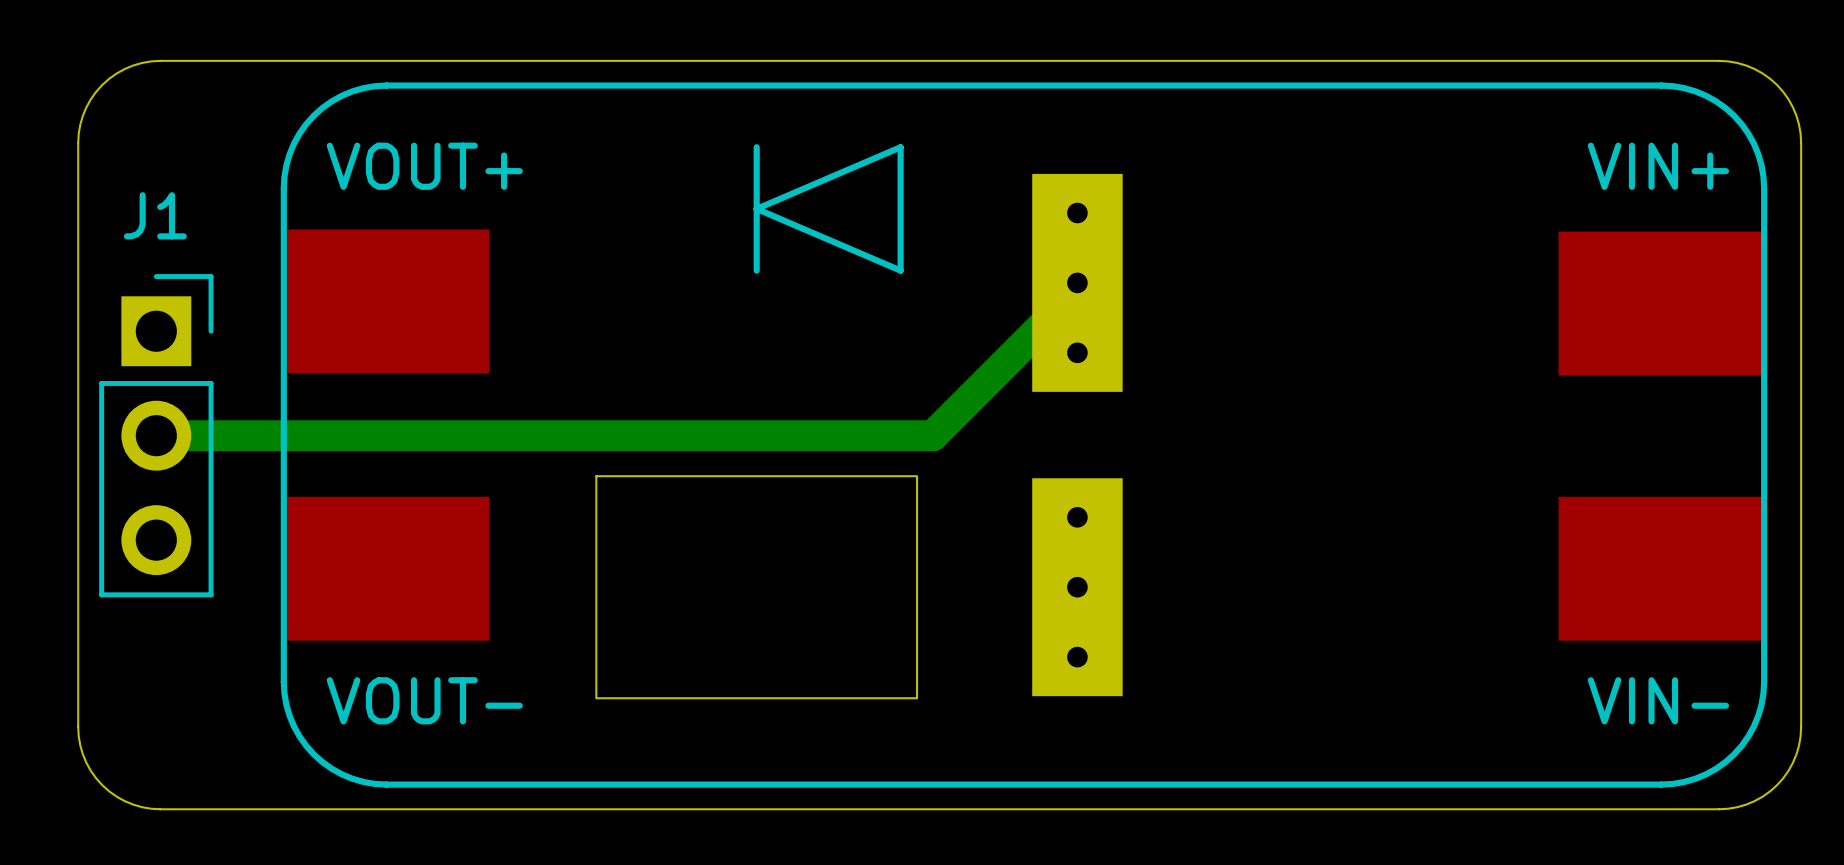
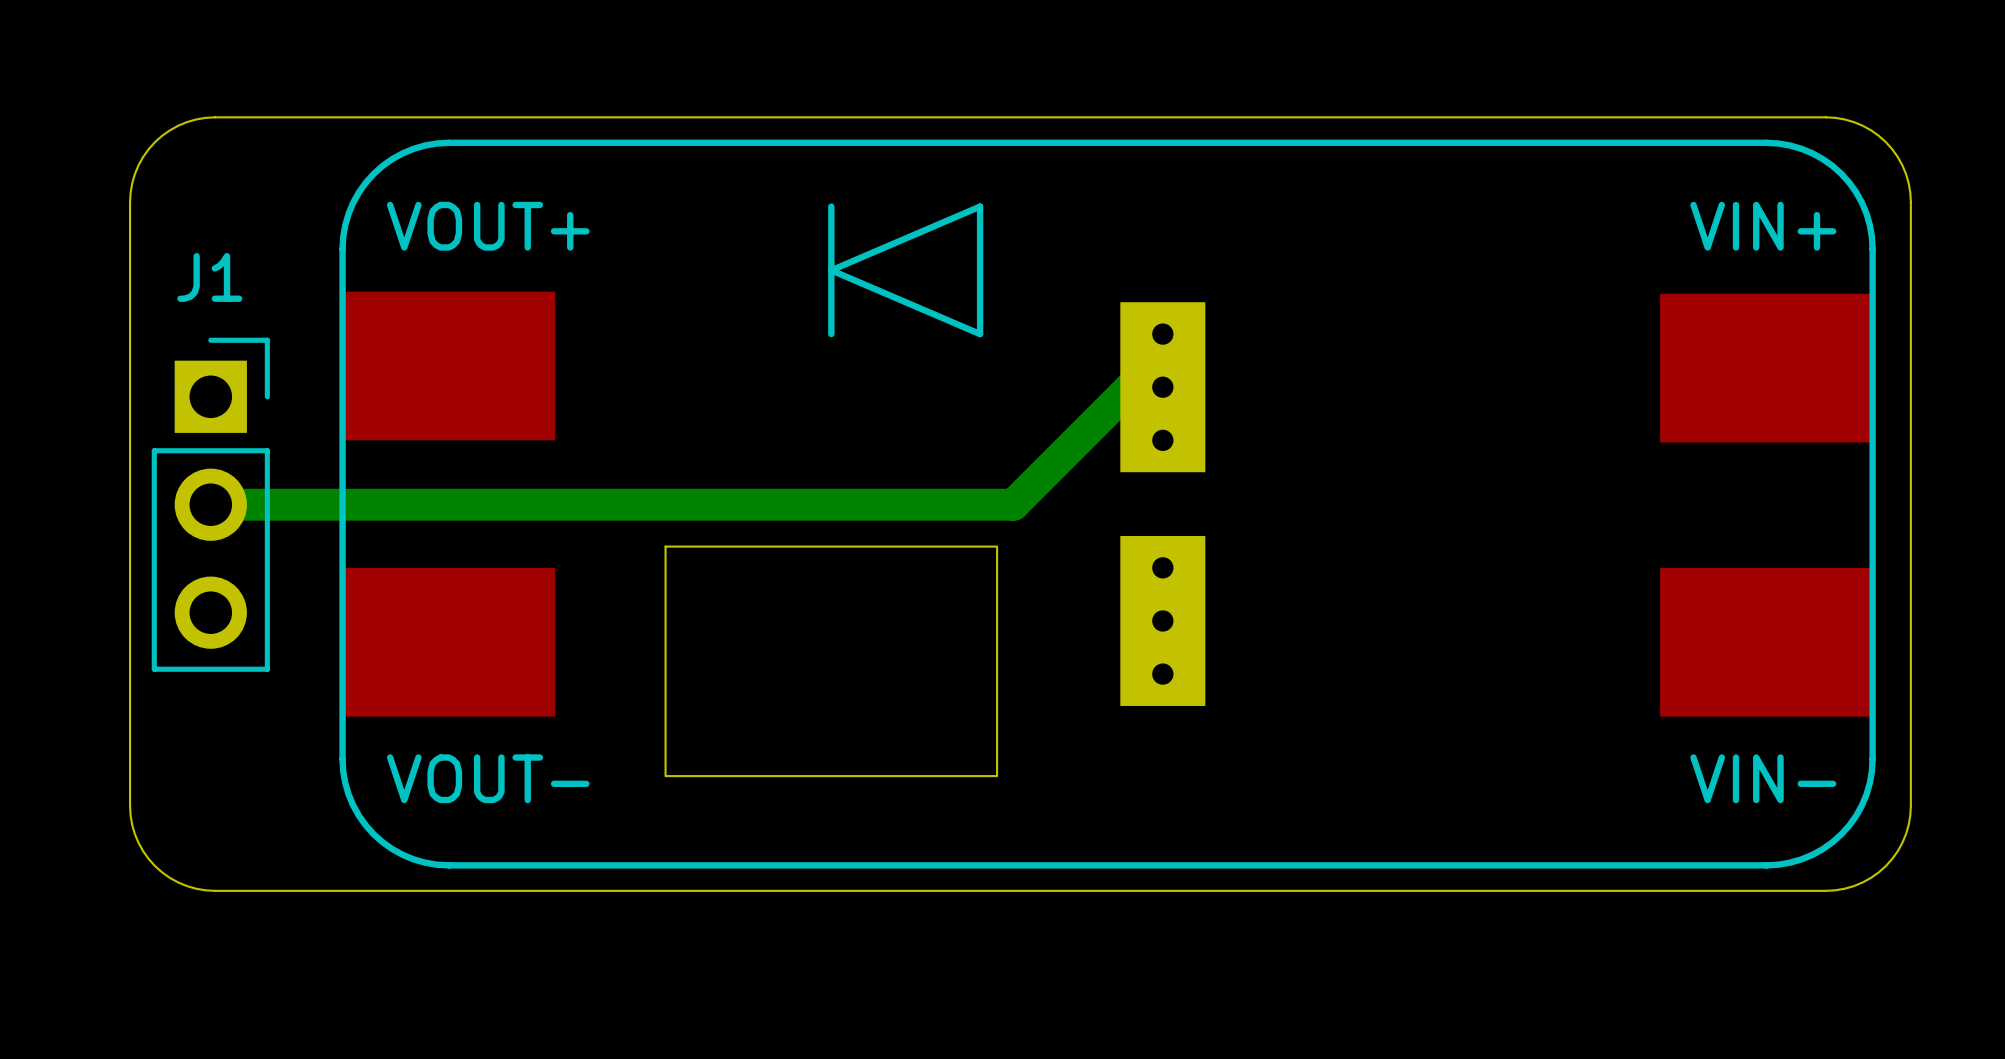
part footprint: [1032, 173, 1123, 697] -> [1120, 302, 1206, 706]

